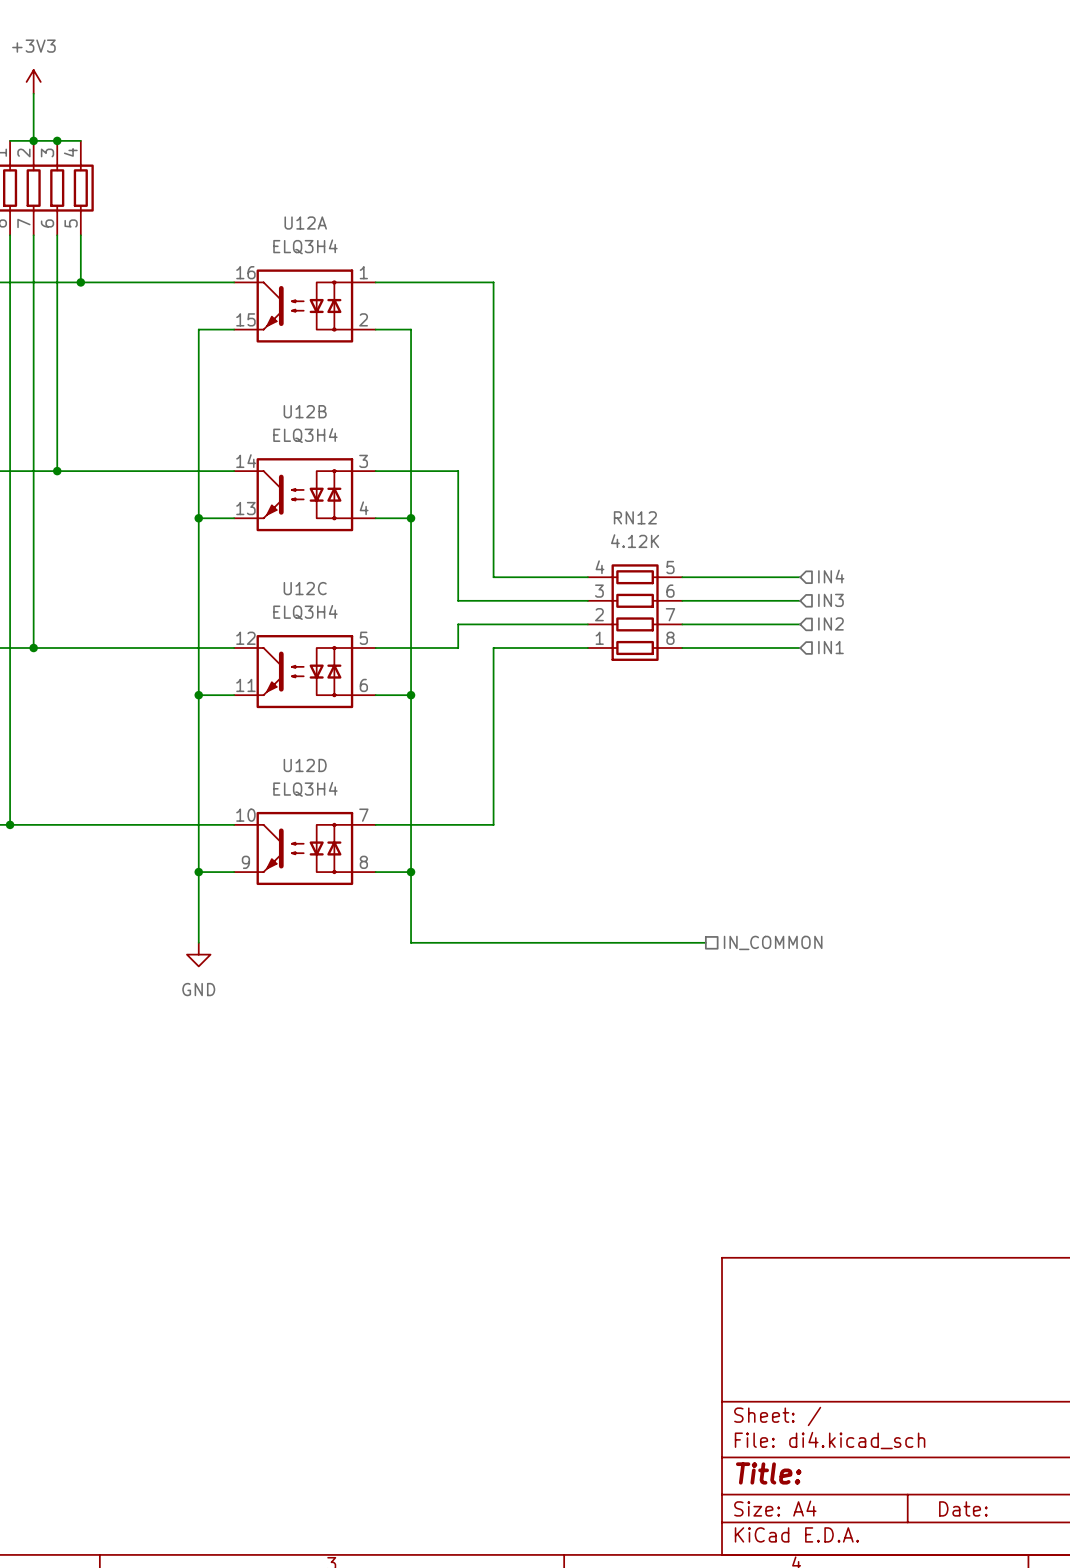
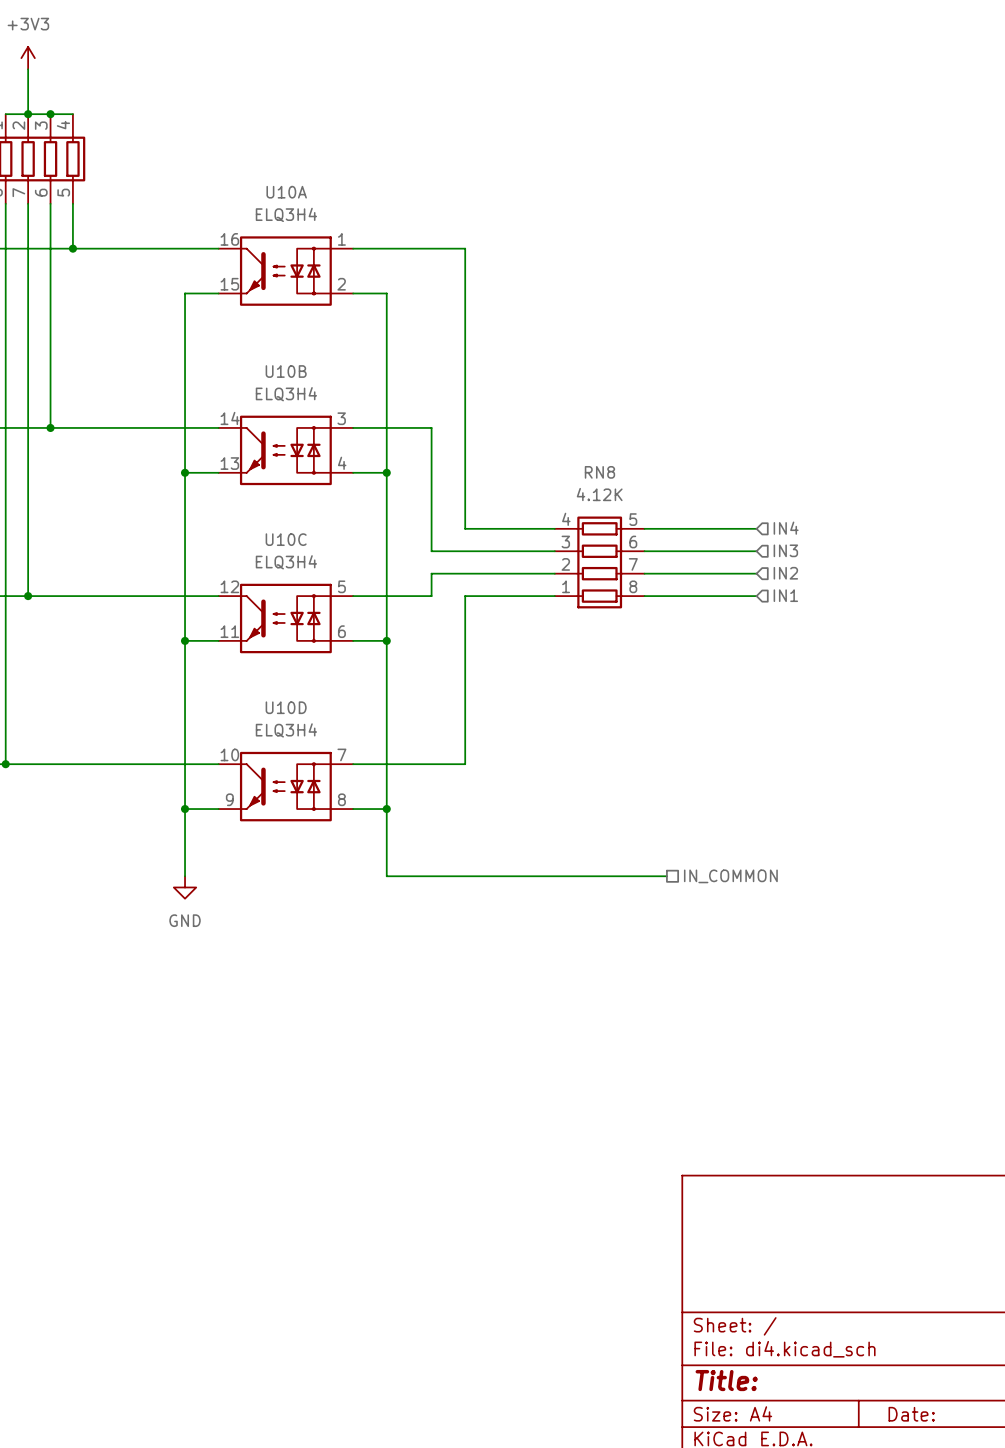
U12A name: U12A (305, 223) -> U10A (286, 192)
U12B name: U12B (305, 411) -> U10B (286, 371)
RN12 name: RN12 (635, 517) -> RN8 (599, 472)
U12C name: U12C (305, 588) -> U10C (286, 539)
U12D name: U12D (305, 765) -> U10D (286, 707)

